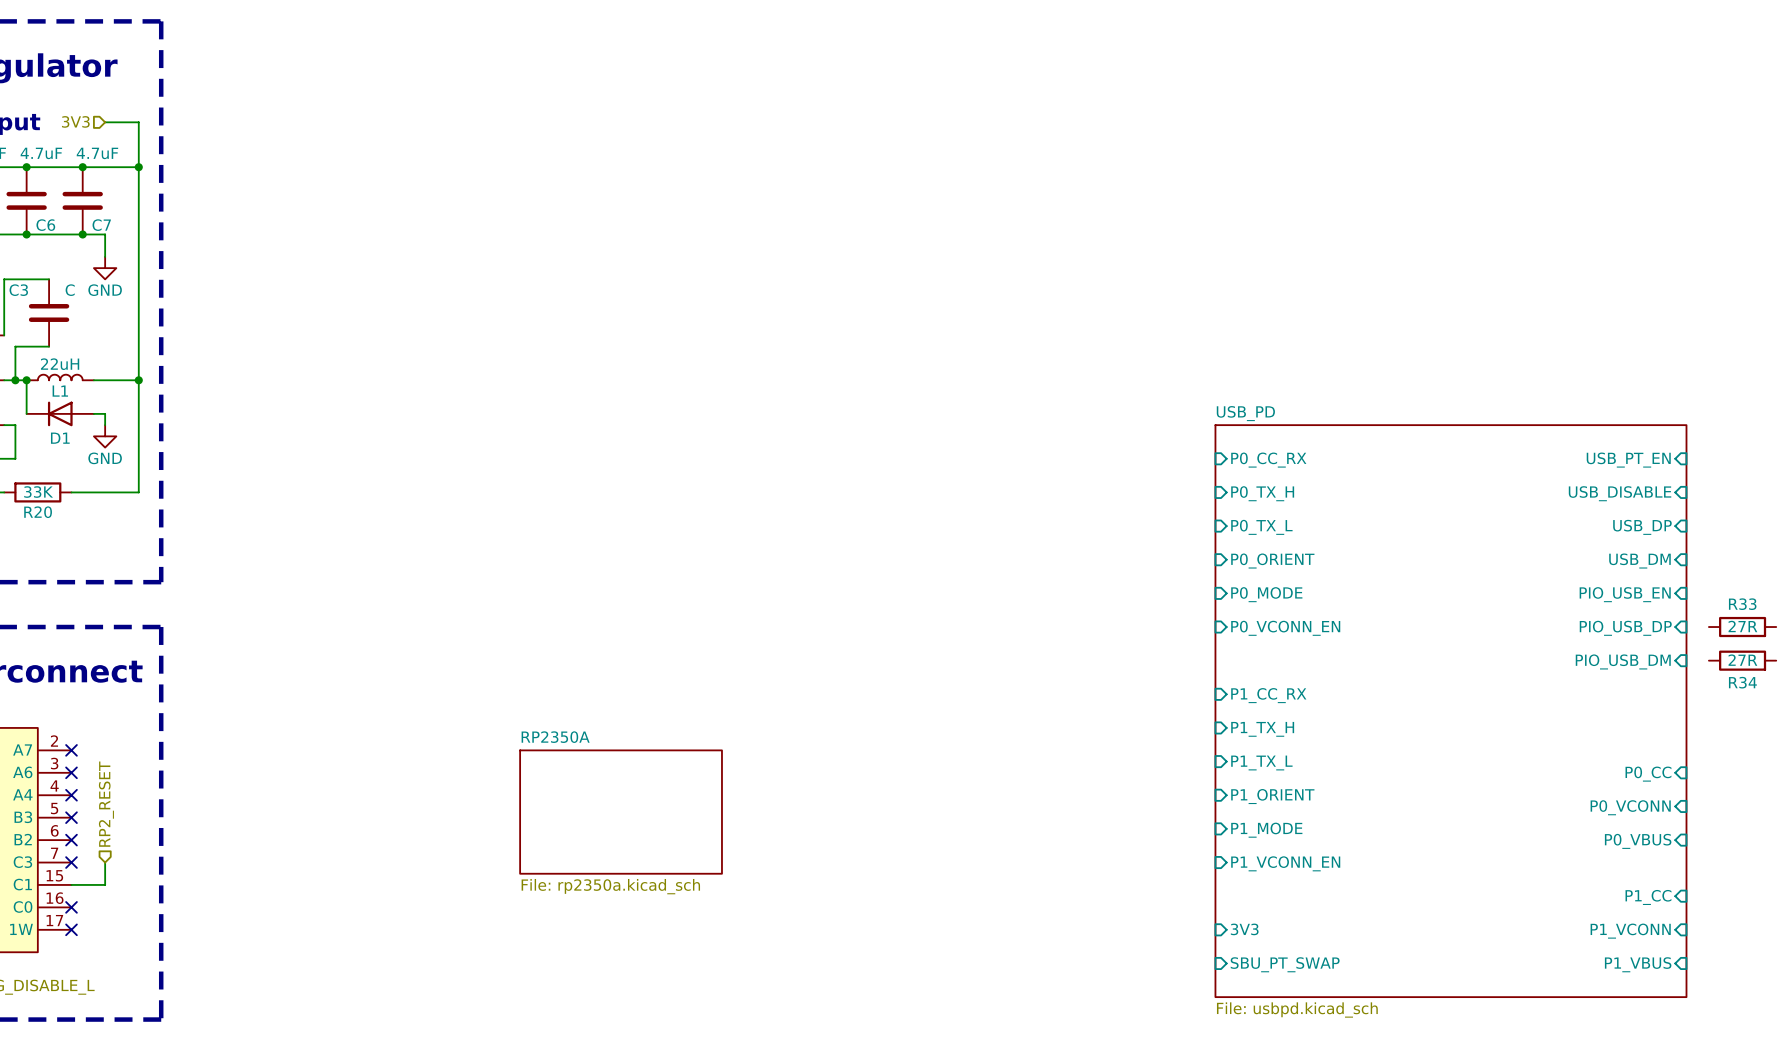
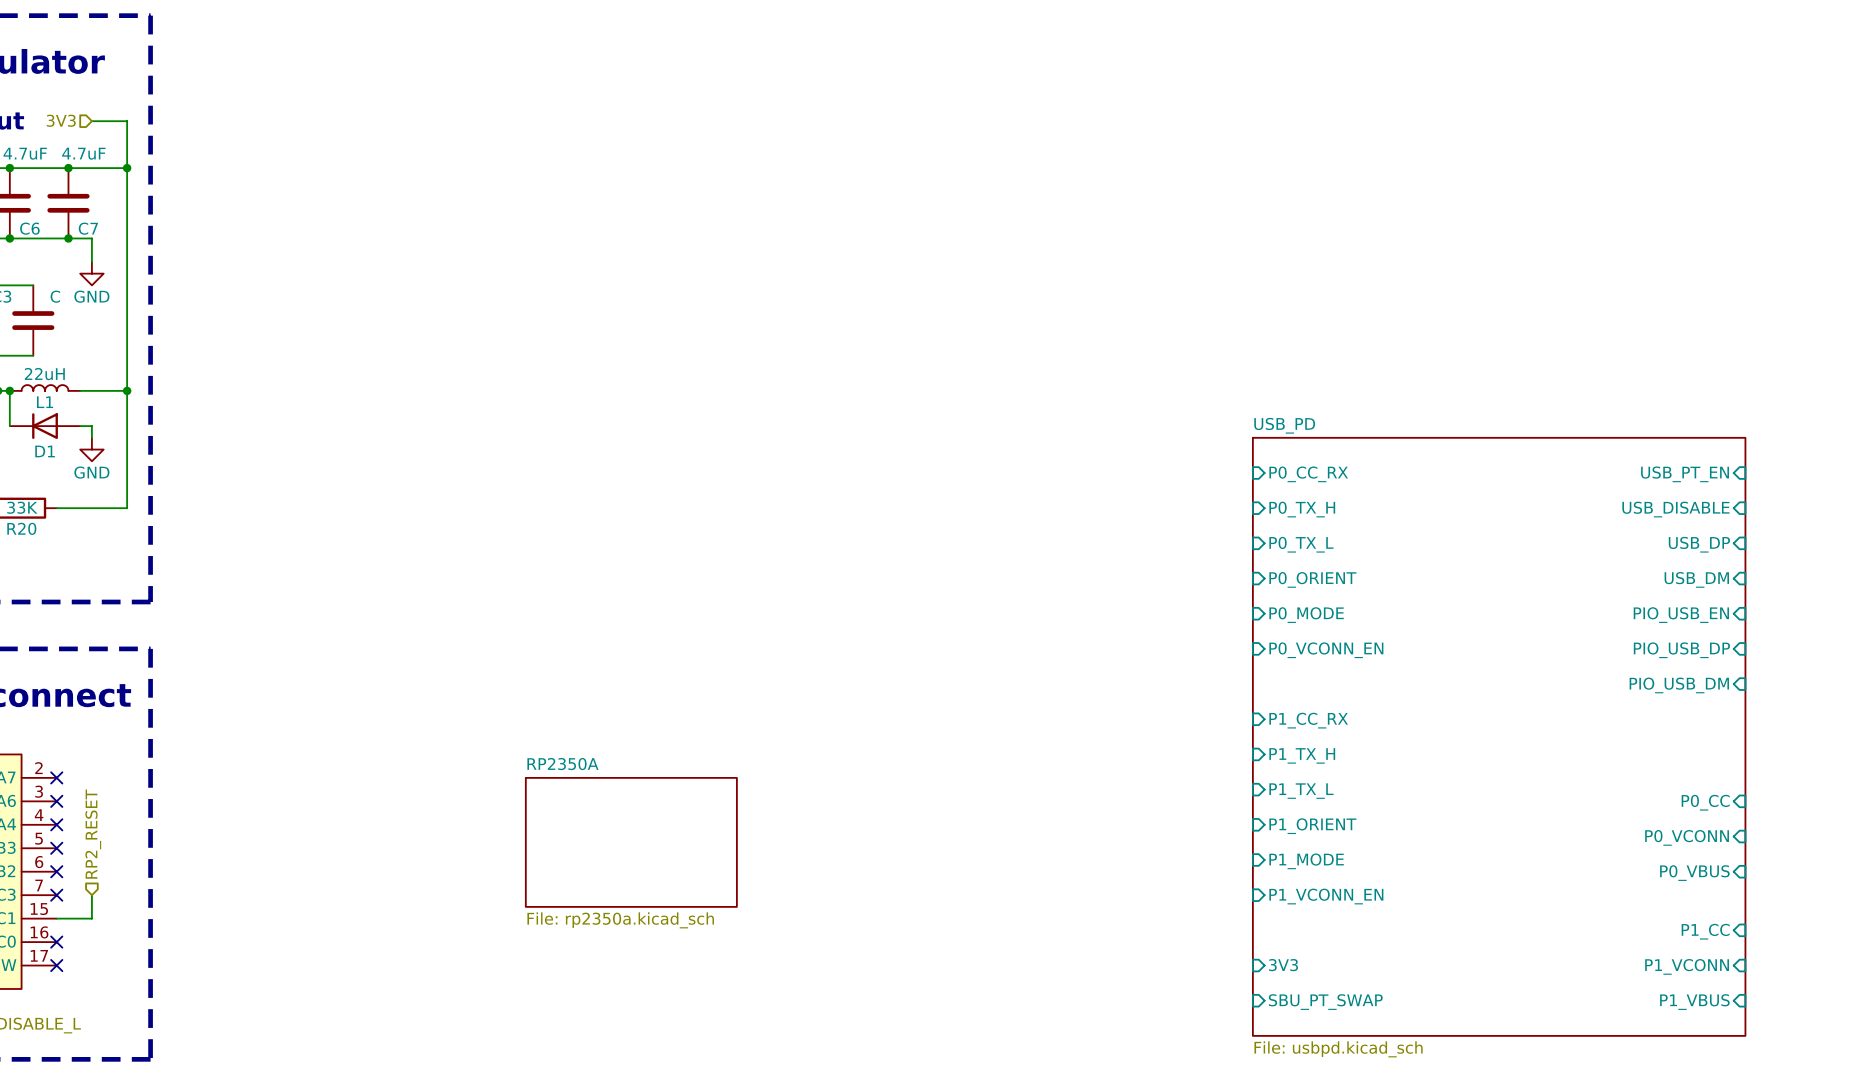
R33: 27R (1742, 627) -> none
R34: 27R (1742, 660) -> none

